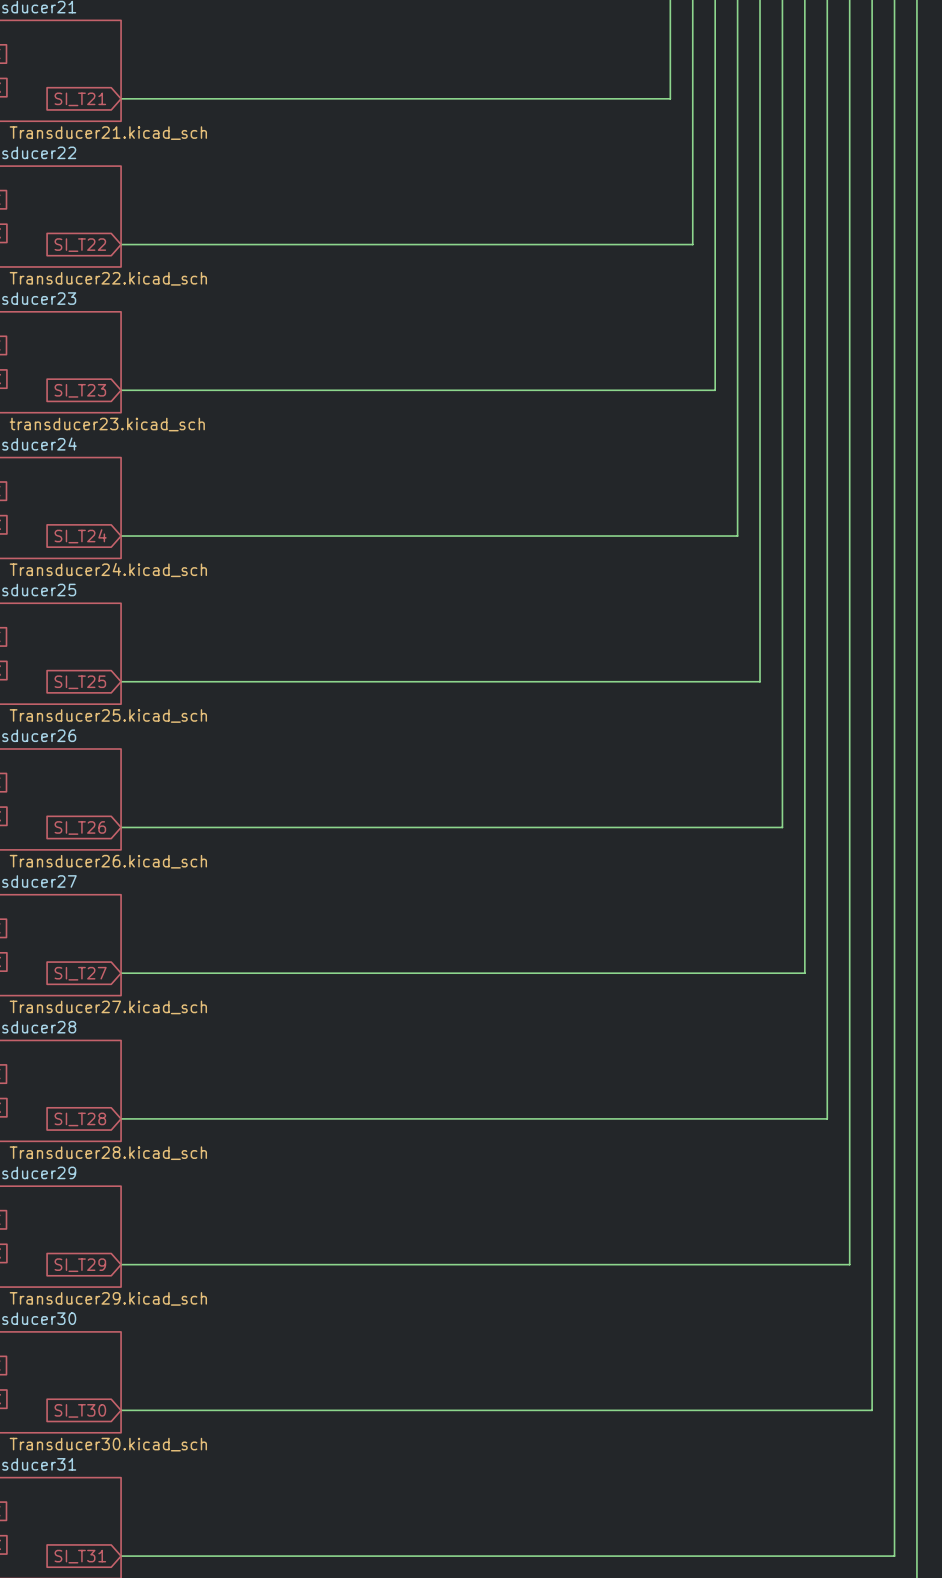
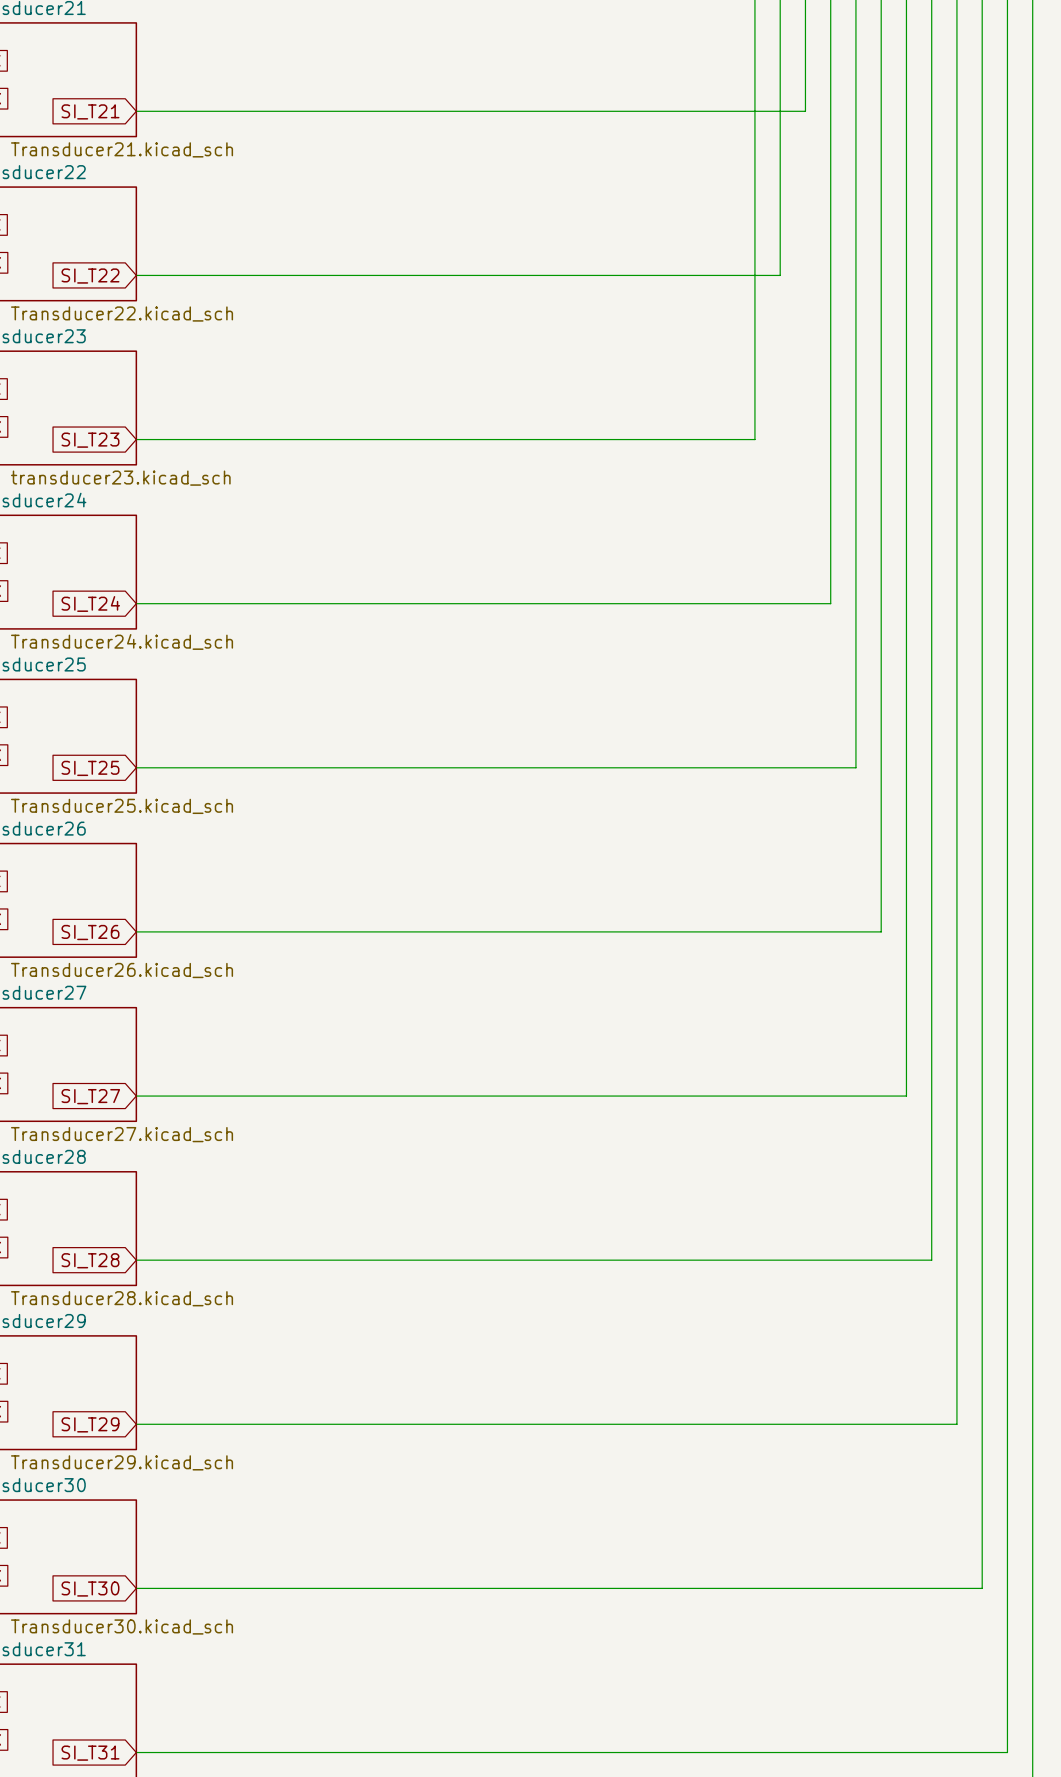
wire: (715, 98) (715, 390) (670, 390) -> (805, 111) (754, 111) (754, 439)

